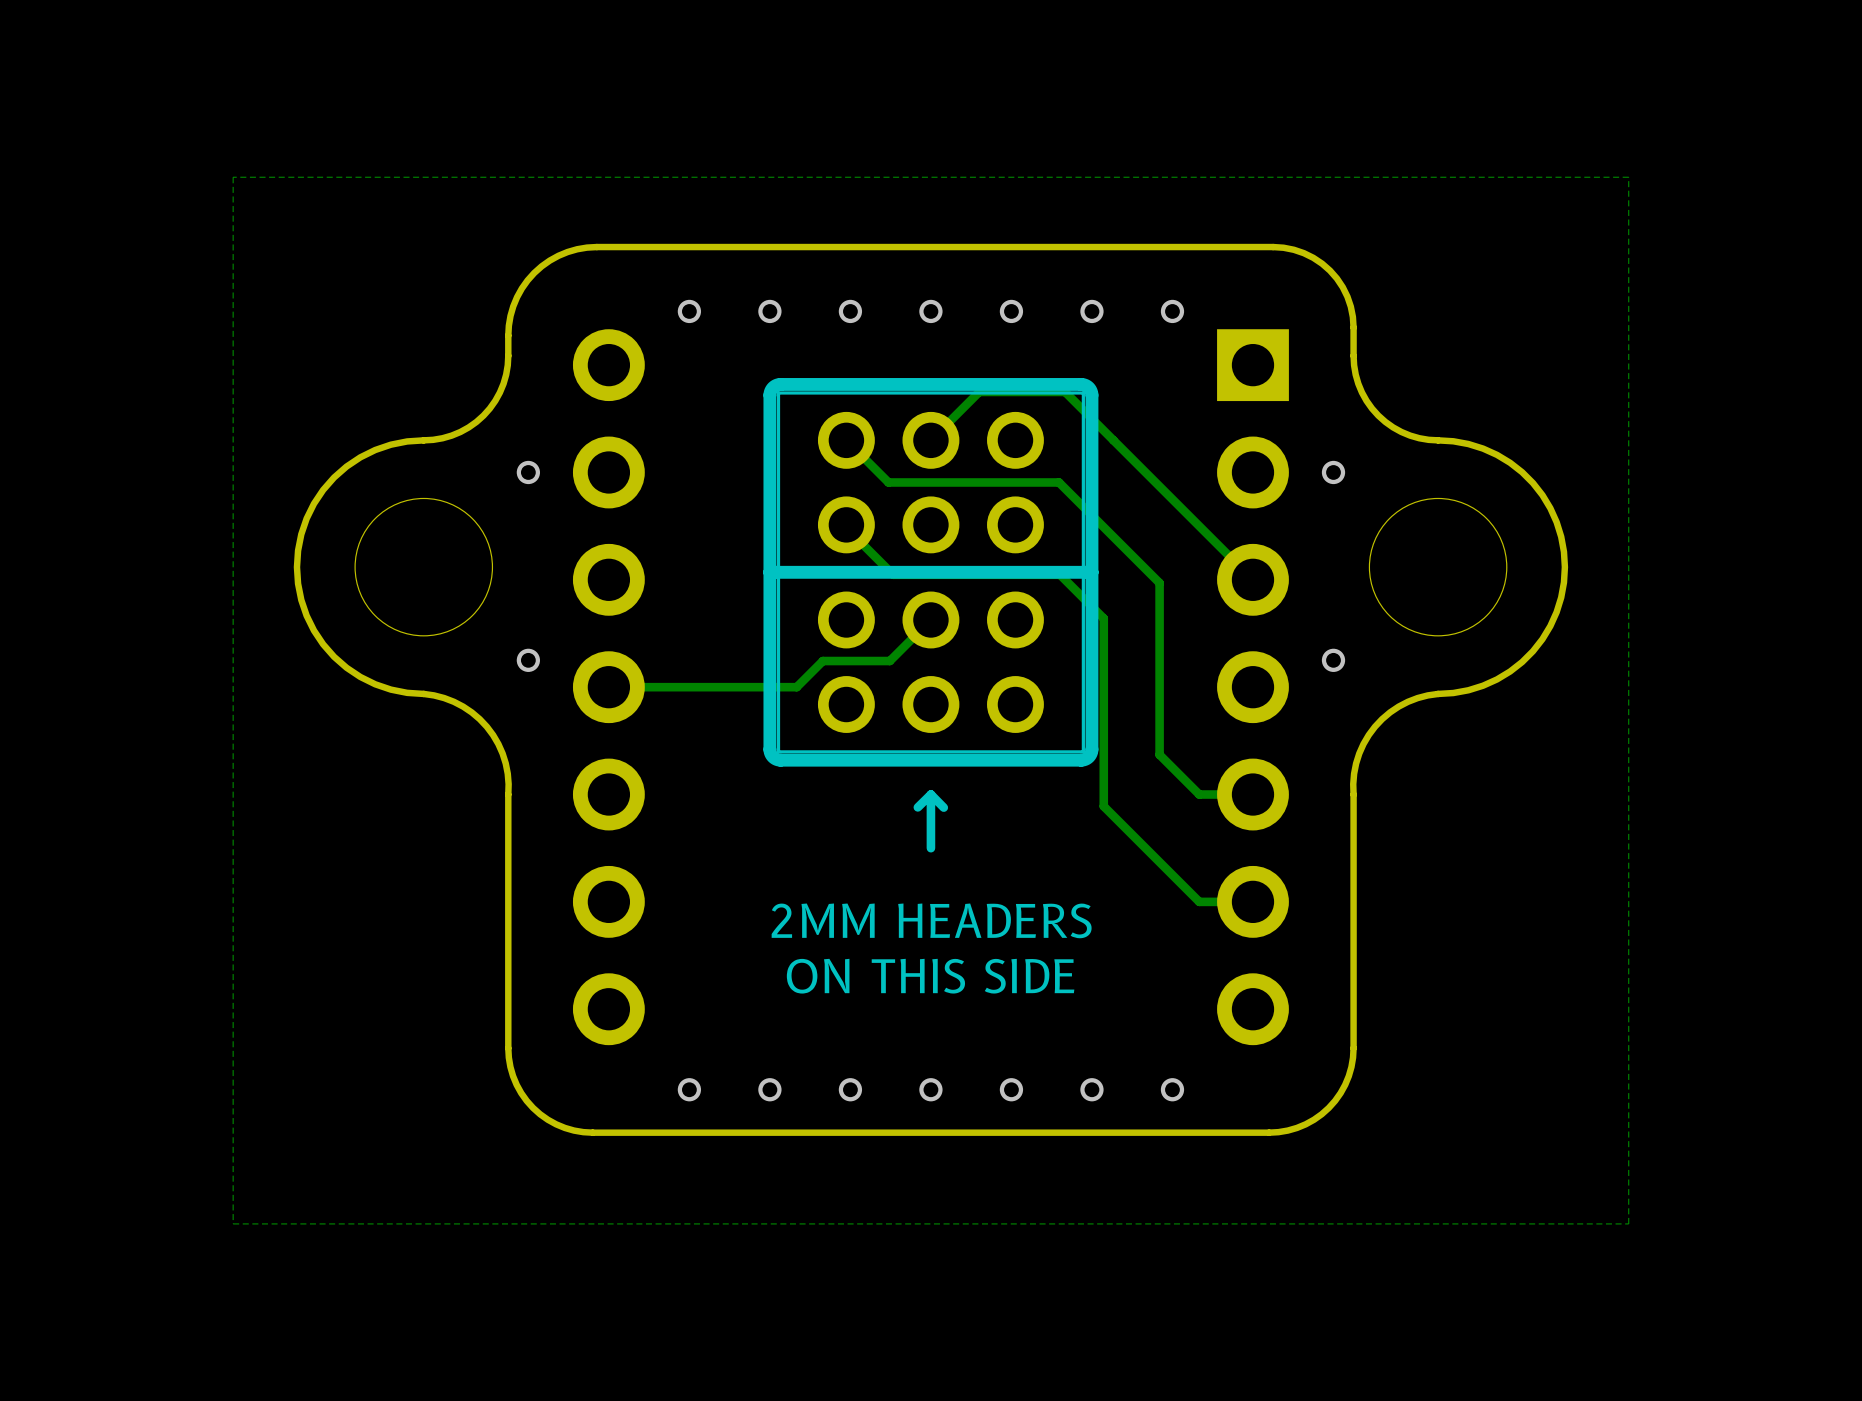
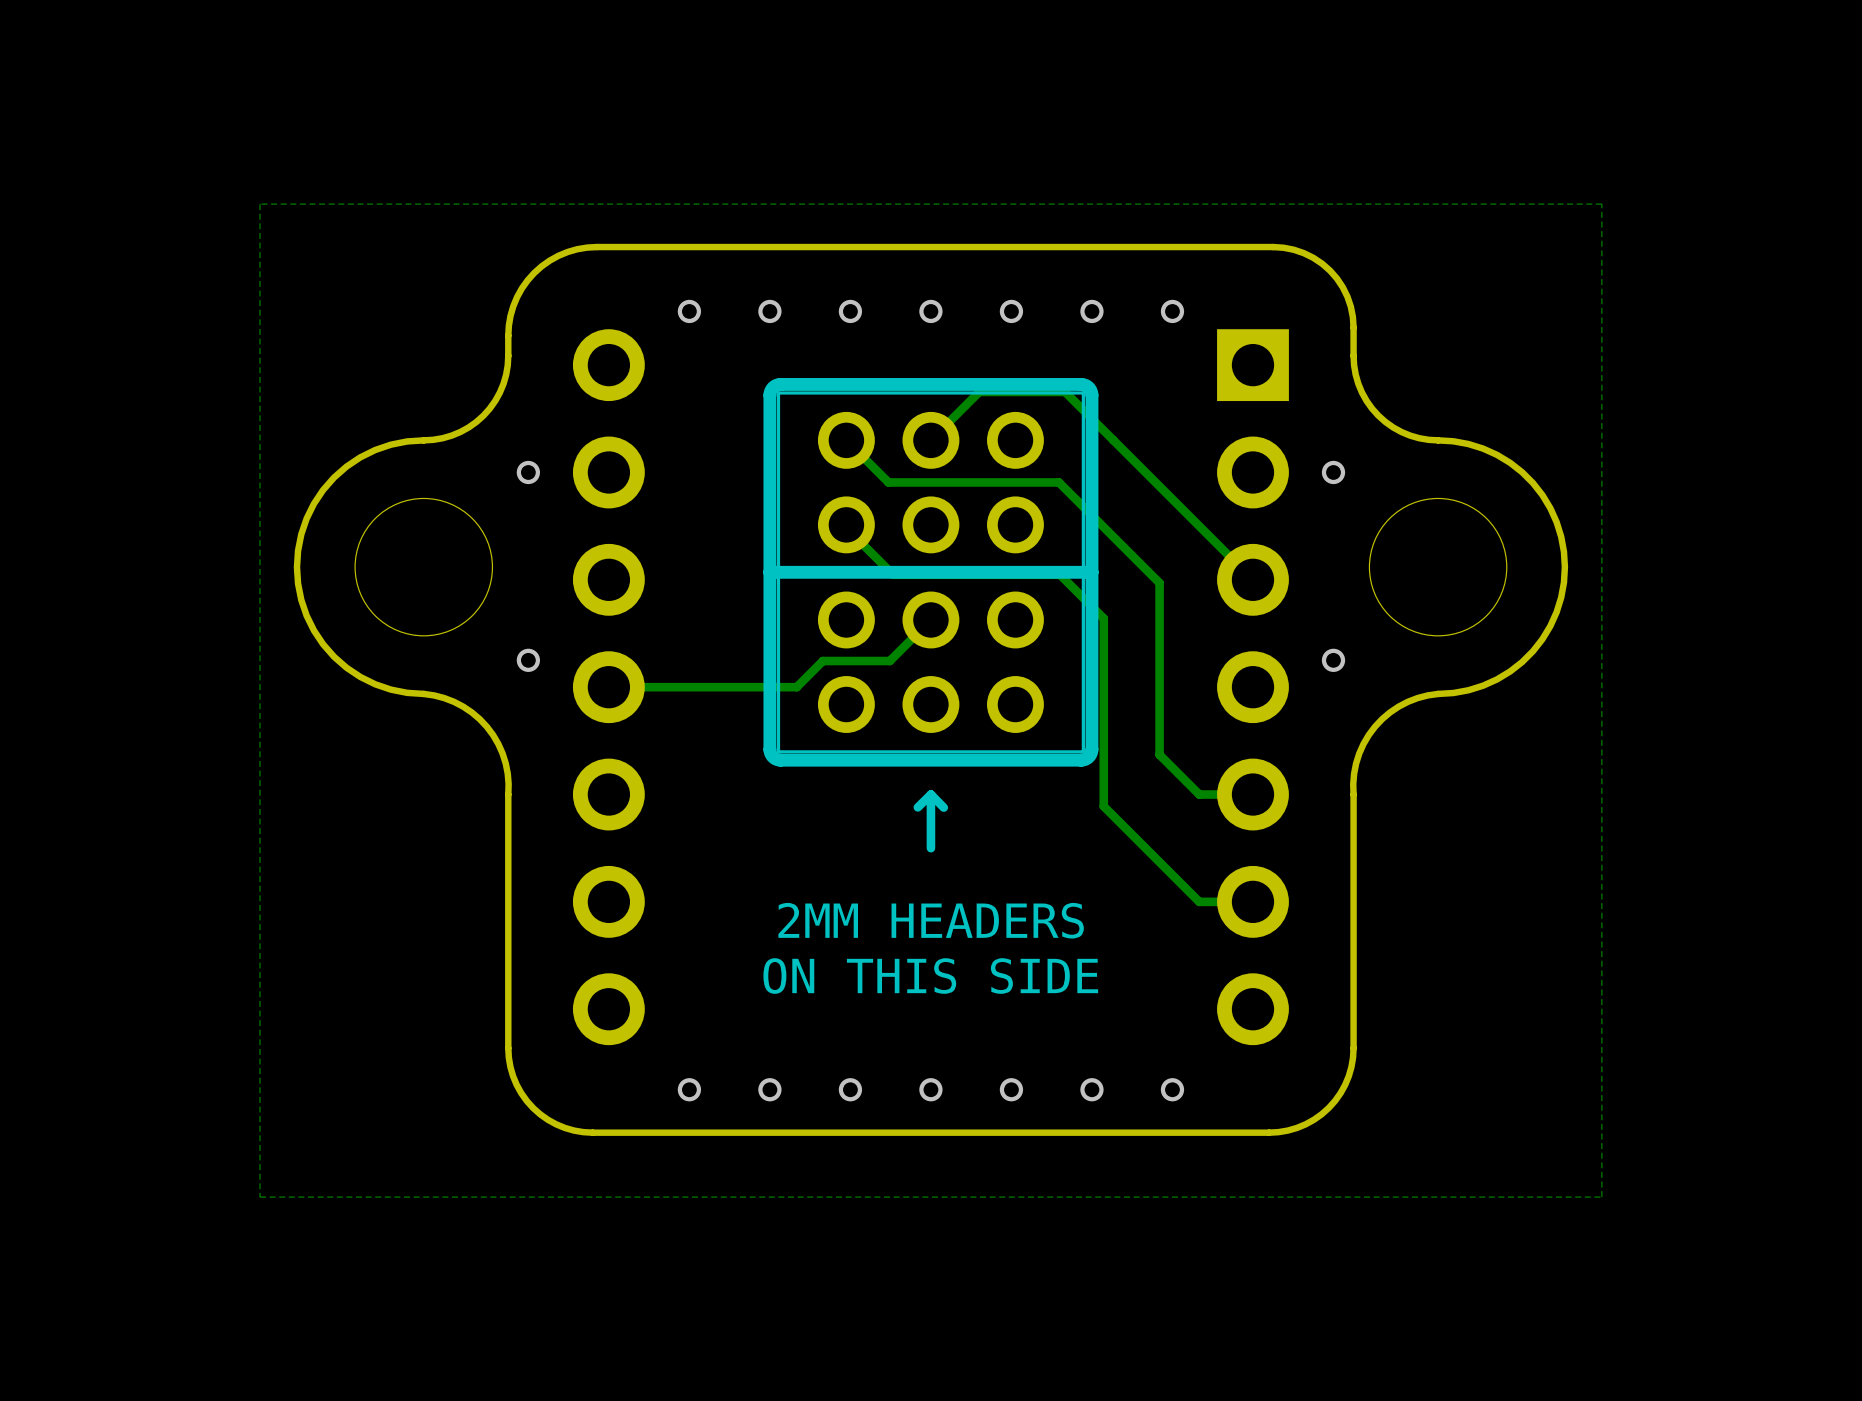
zone outline: (1628, 177) (1628, 1223) (233, 1223) (233, 177) (1628, 177) -> (1601, 204) (1601, 1197) (260, 1197) (260, 204) (1601, 204)

